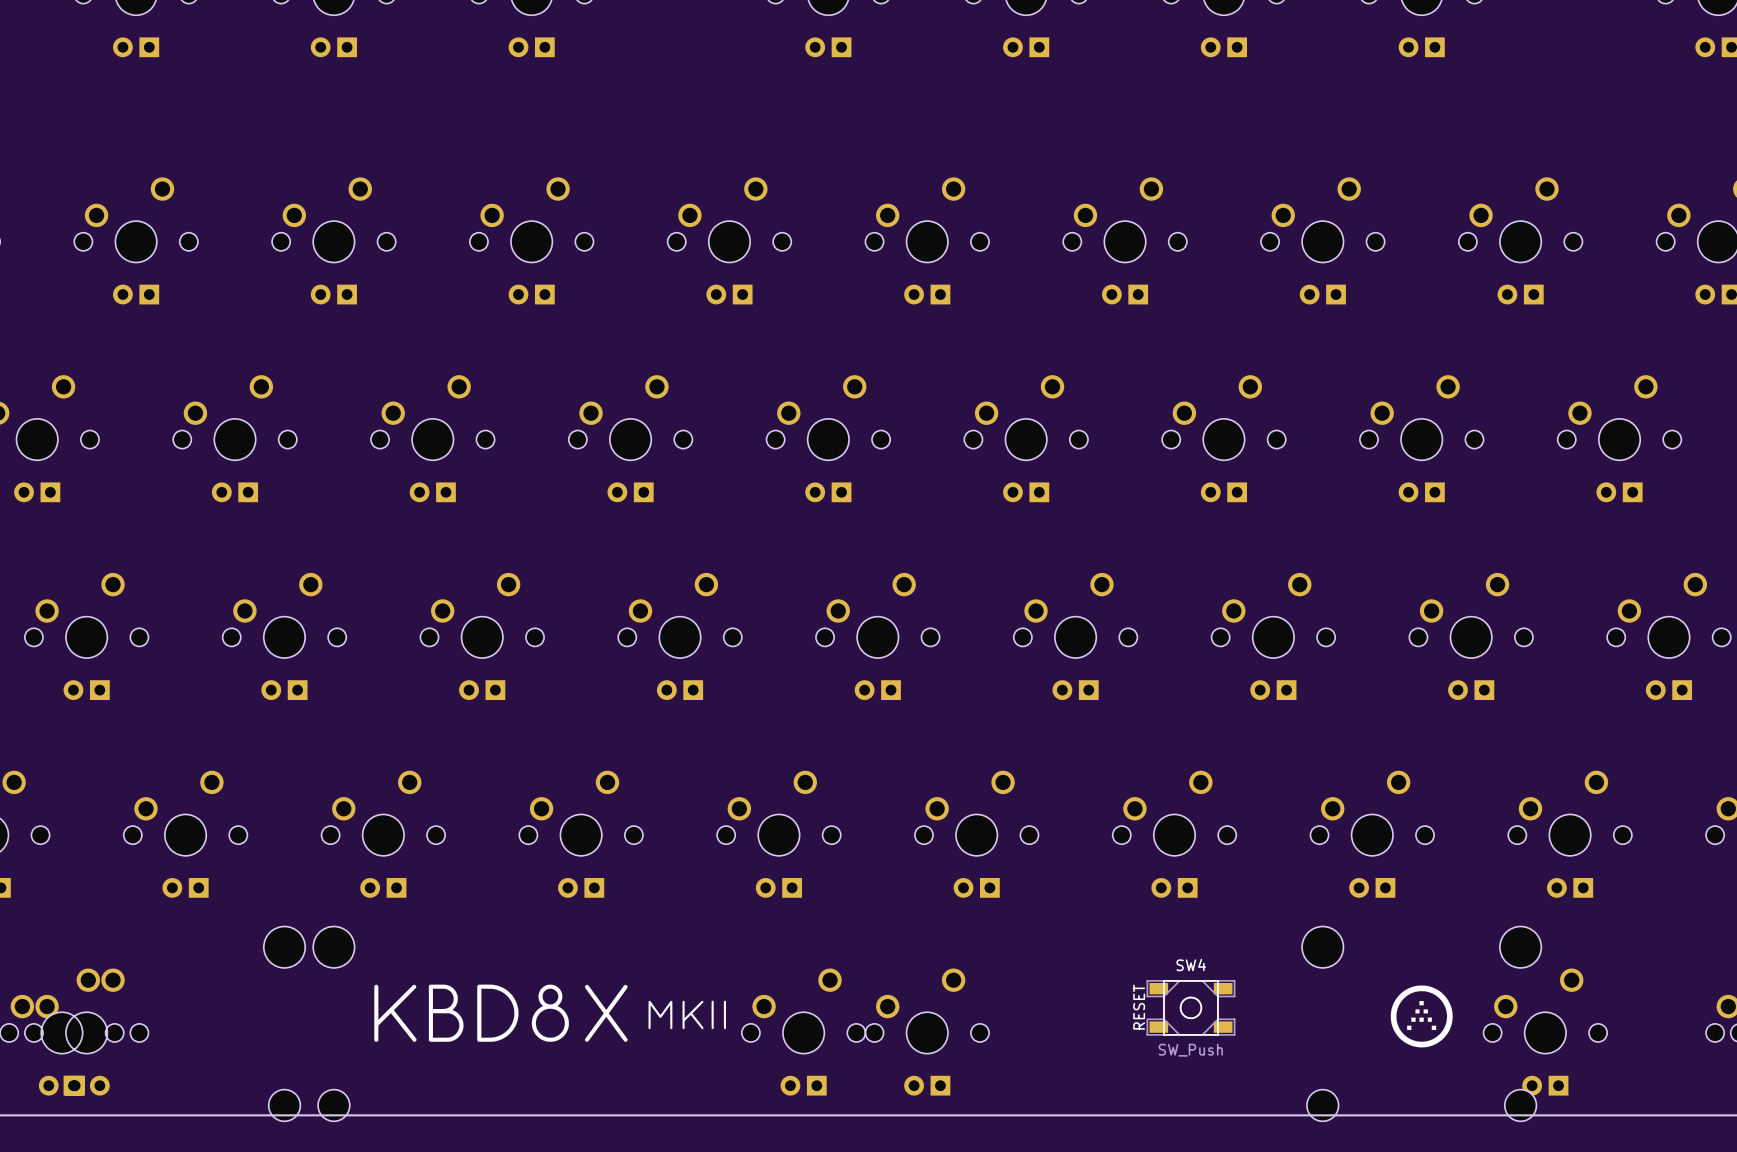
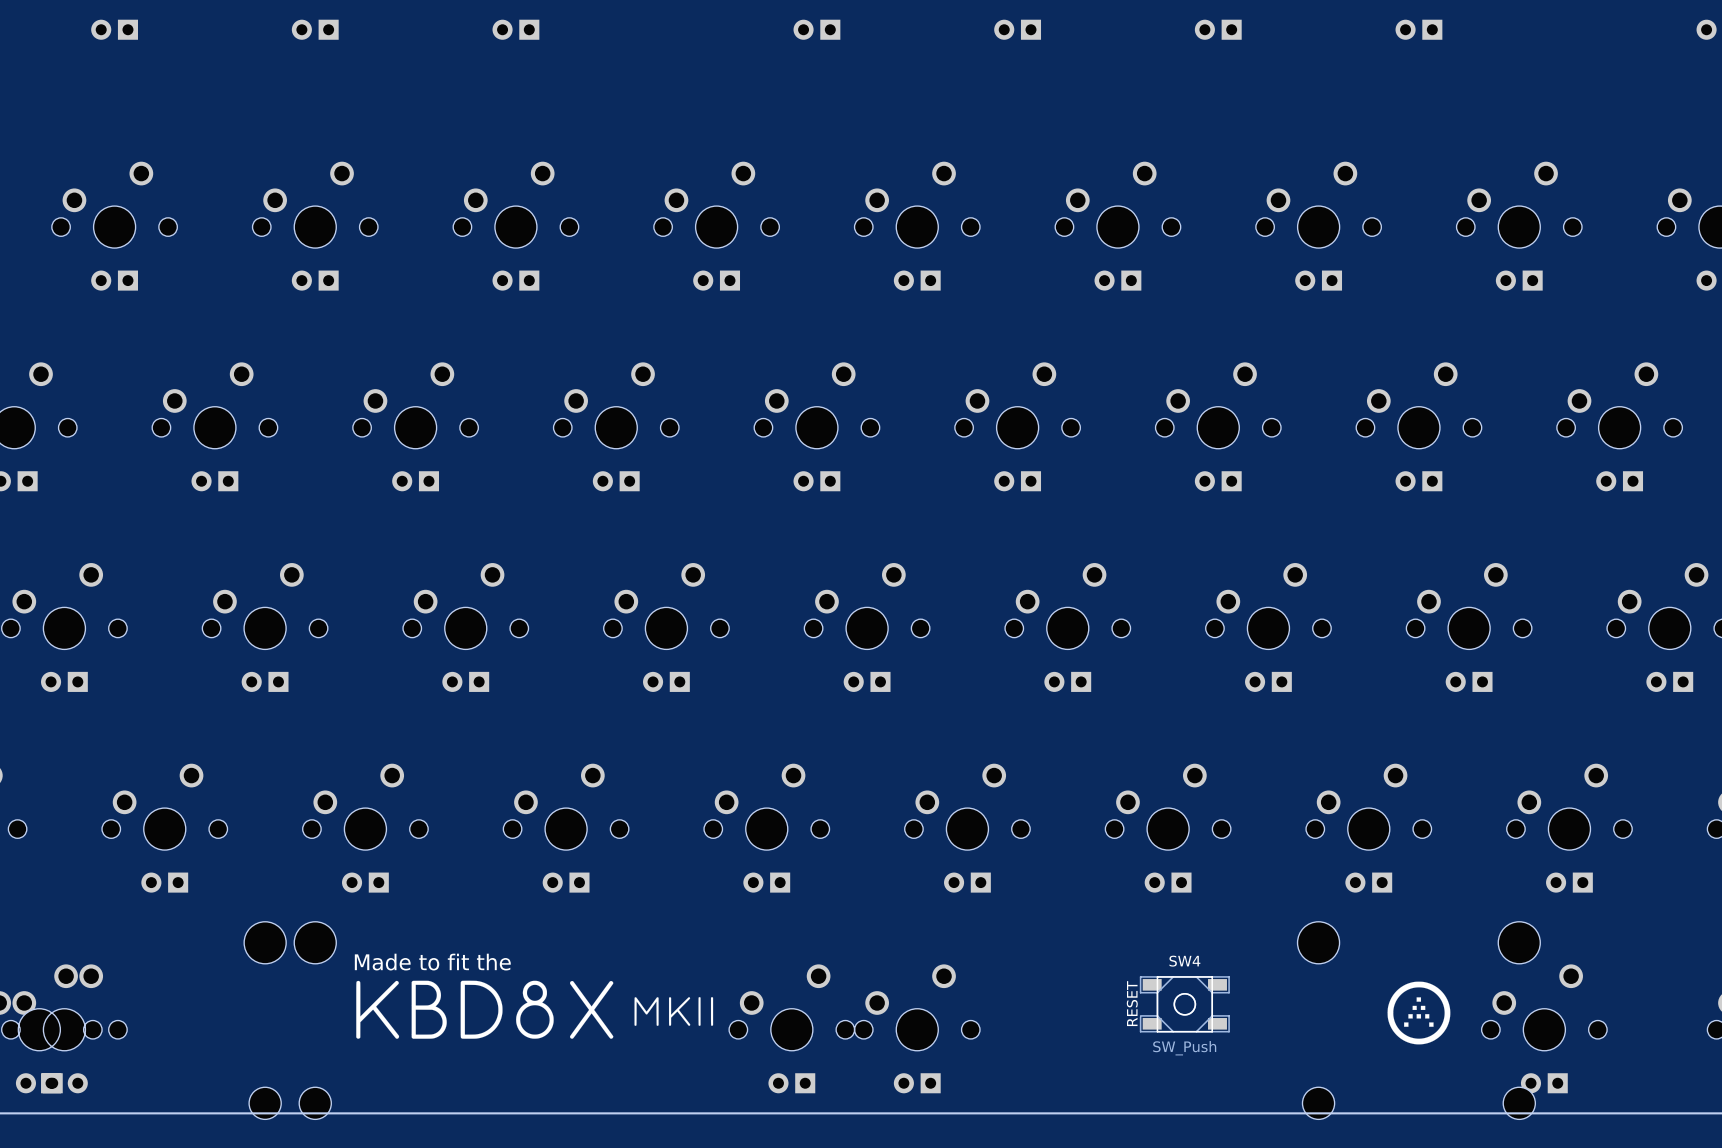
text: none -> Made to fit the (432, 962)

